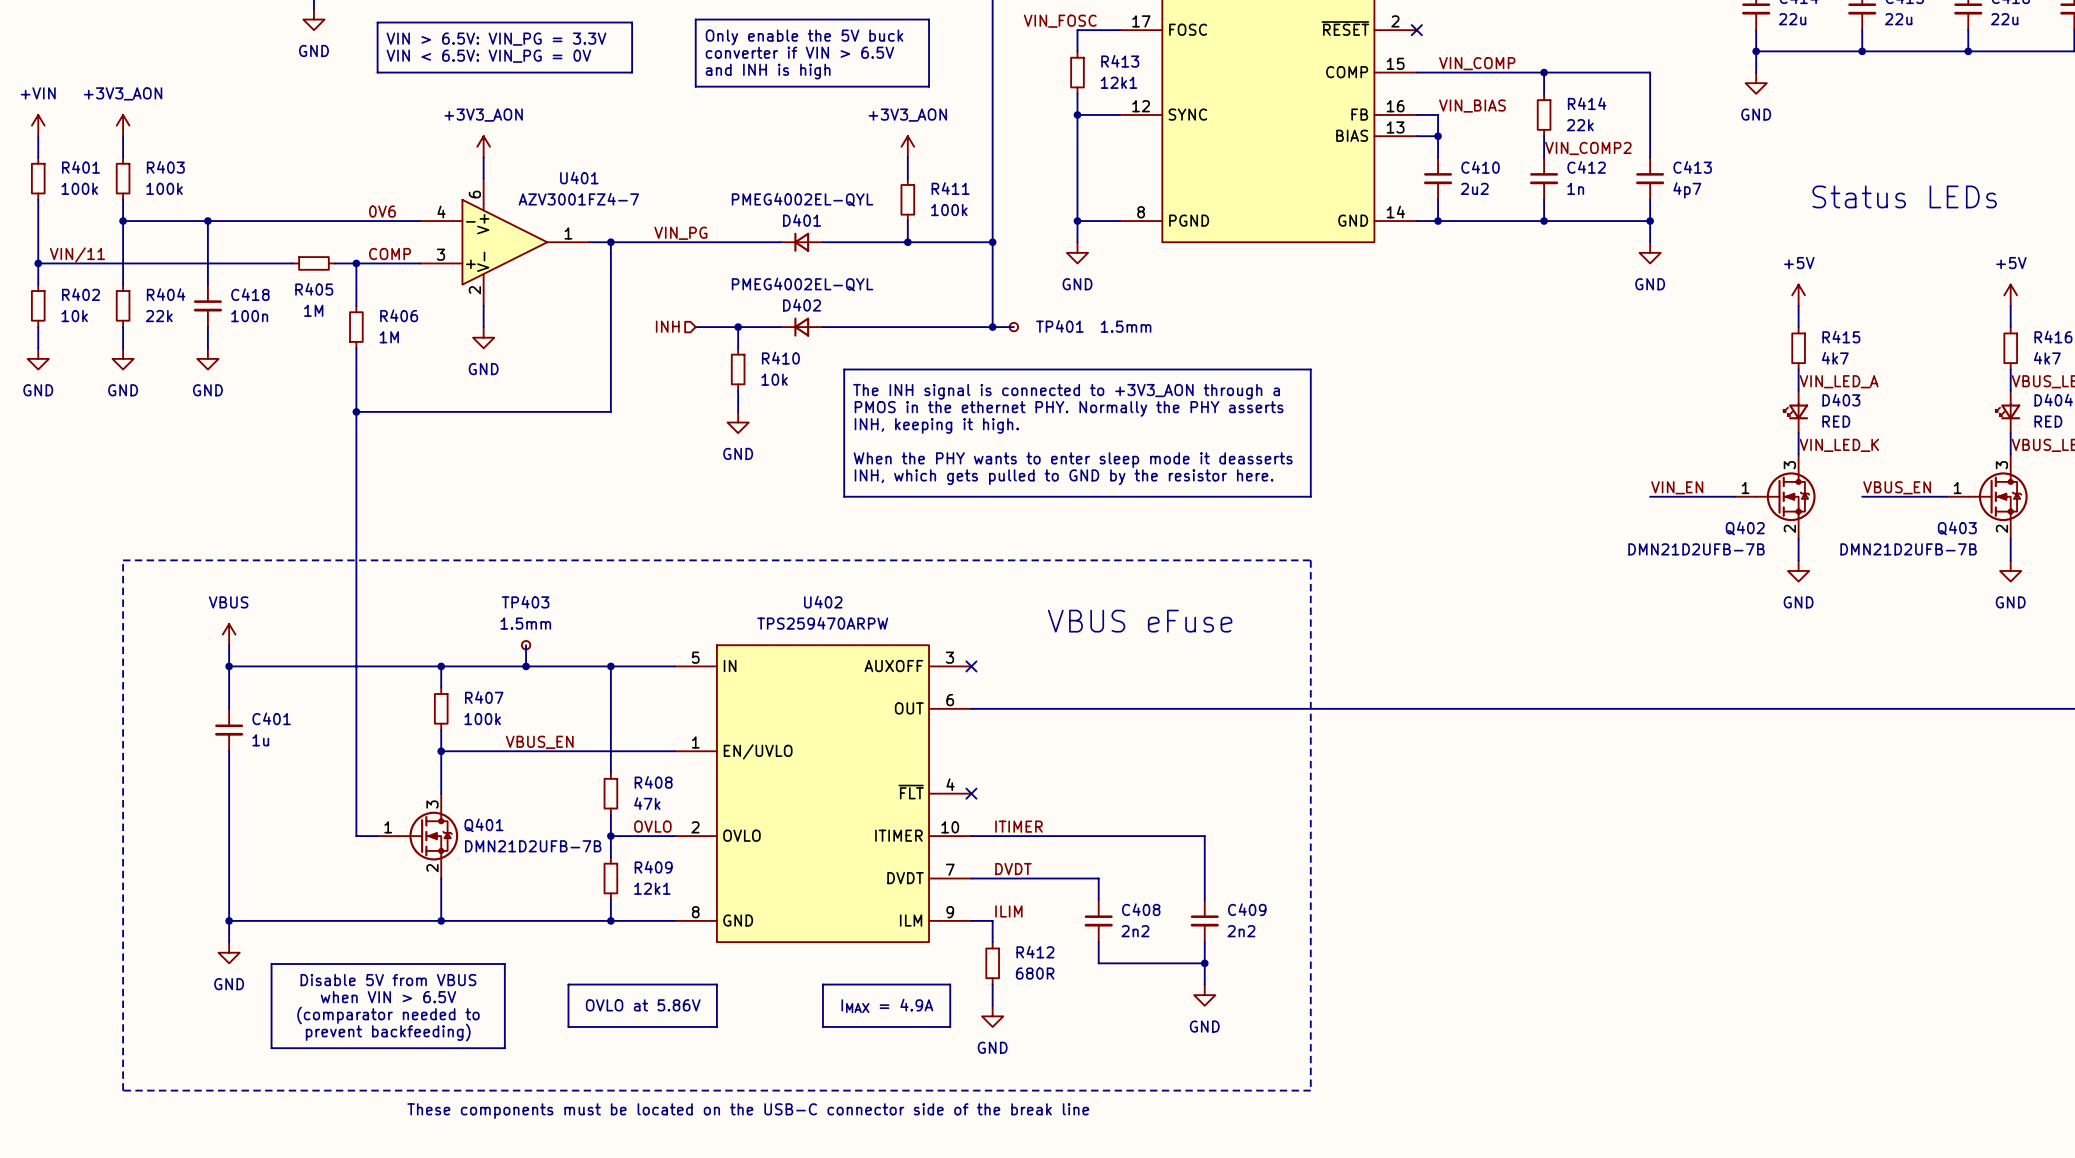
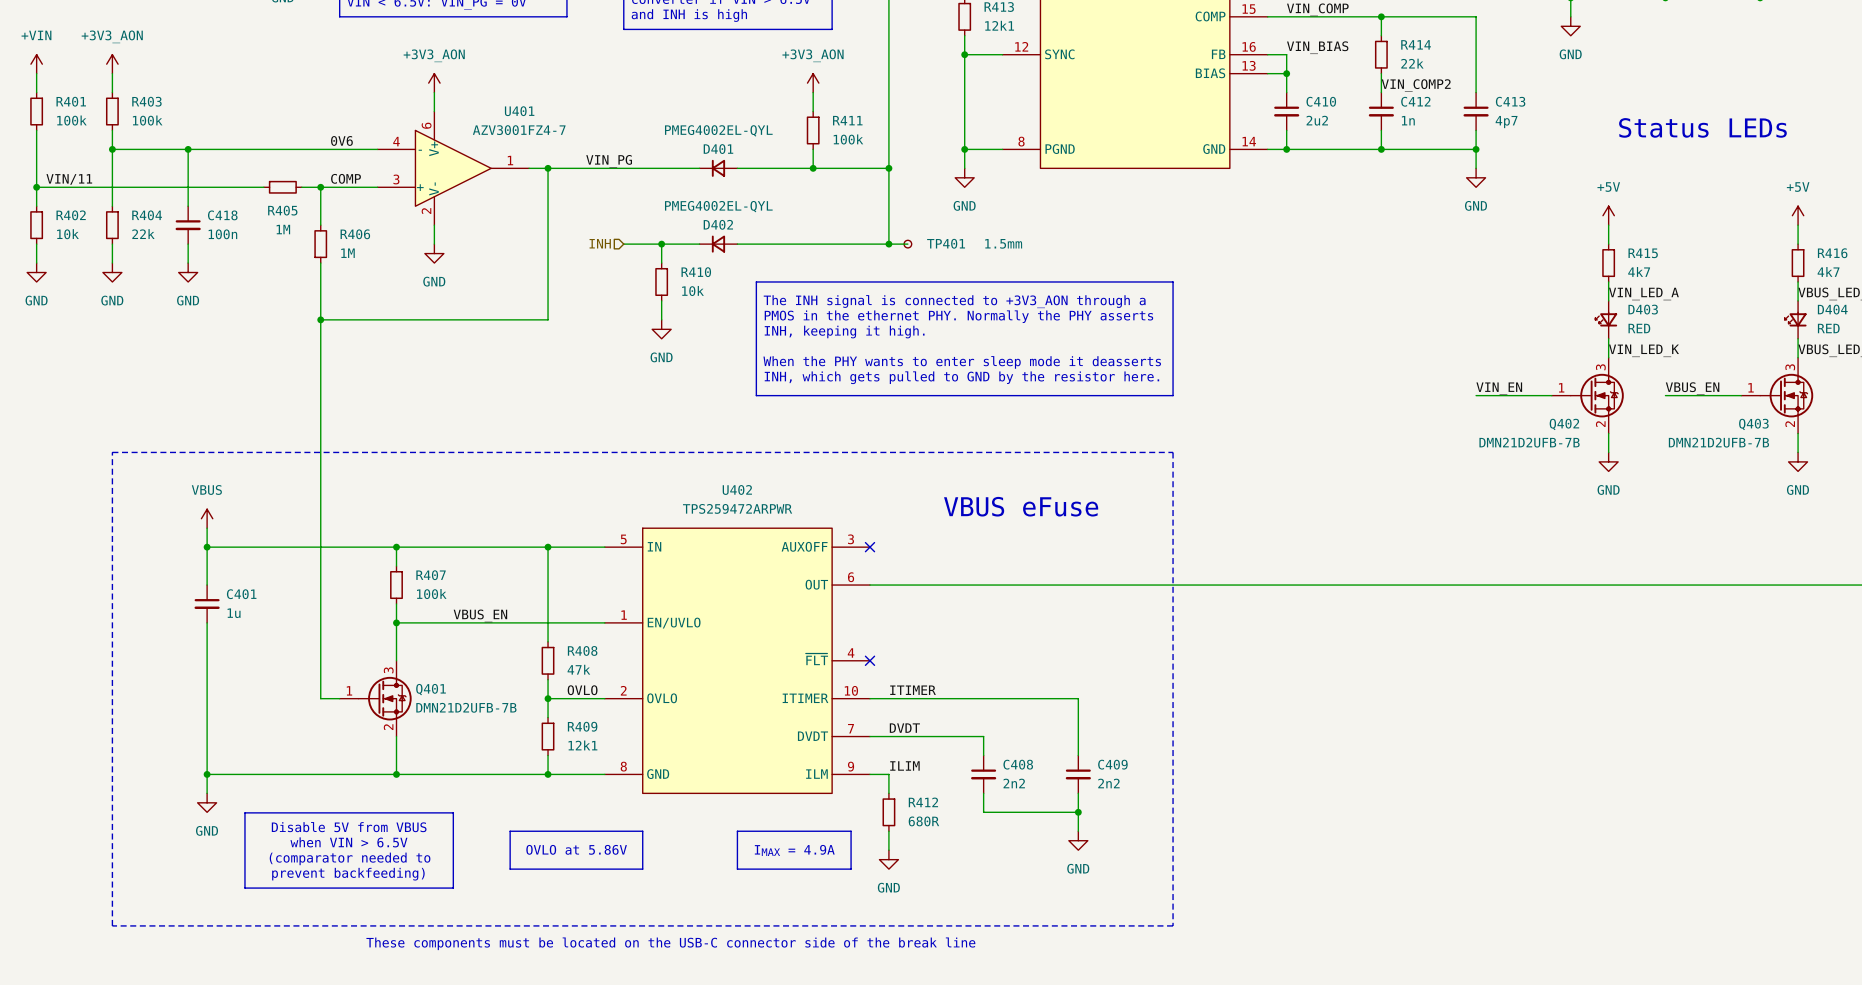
U402 value: TPS259470ARPW (822, 623) -> TPS259472ARPWR (737, 508)
wire: (526, 645) (526, 666) -> none
TP403: 1.5mm (526, 645) -> none
junction: (526, 666) -> none

